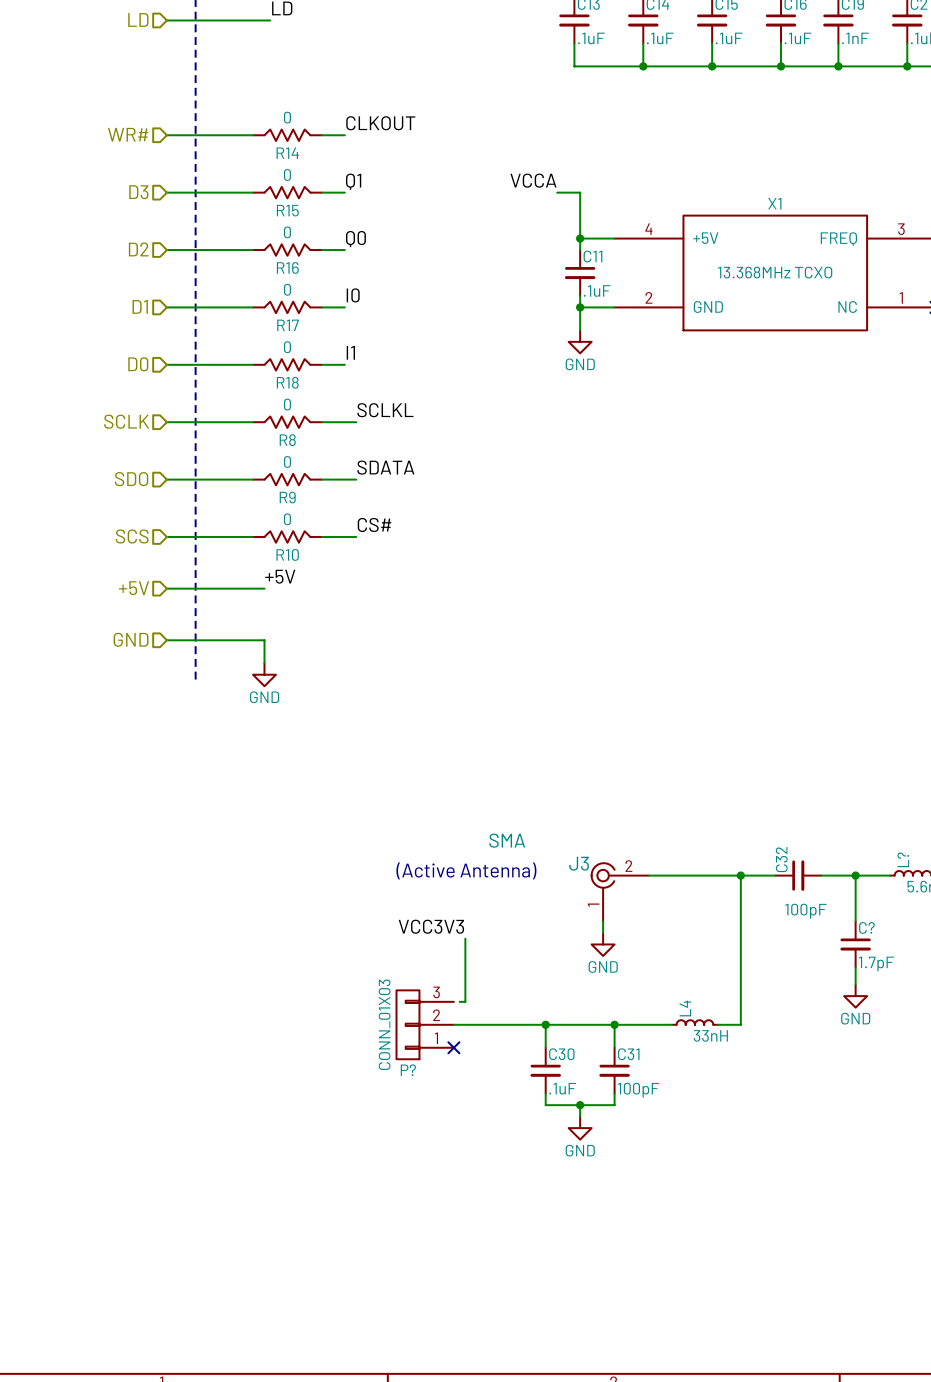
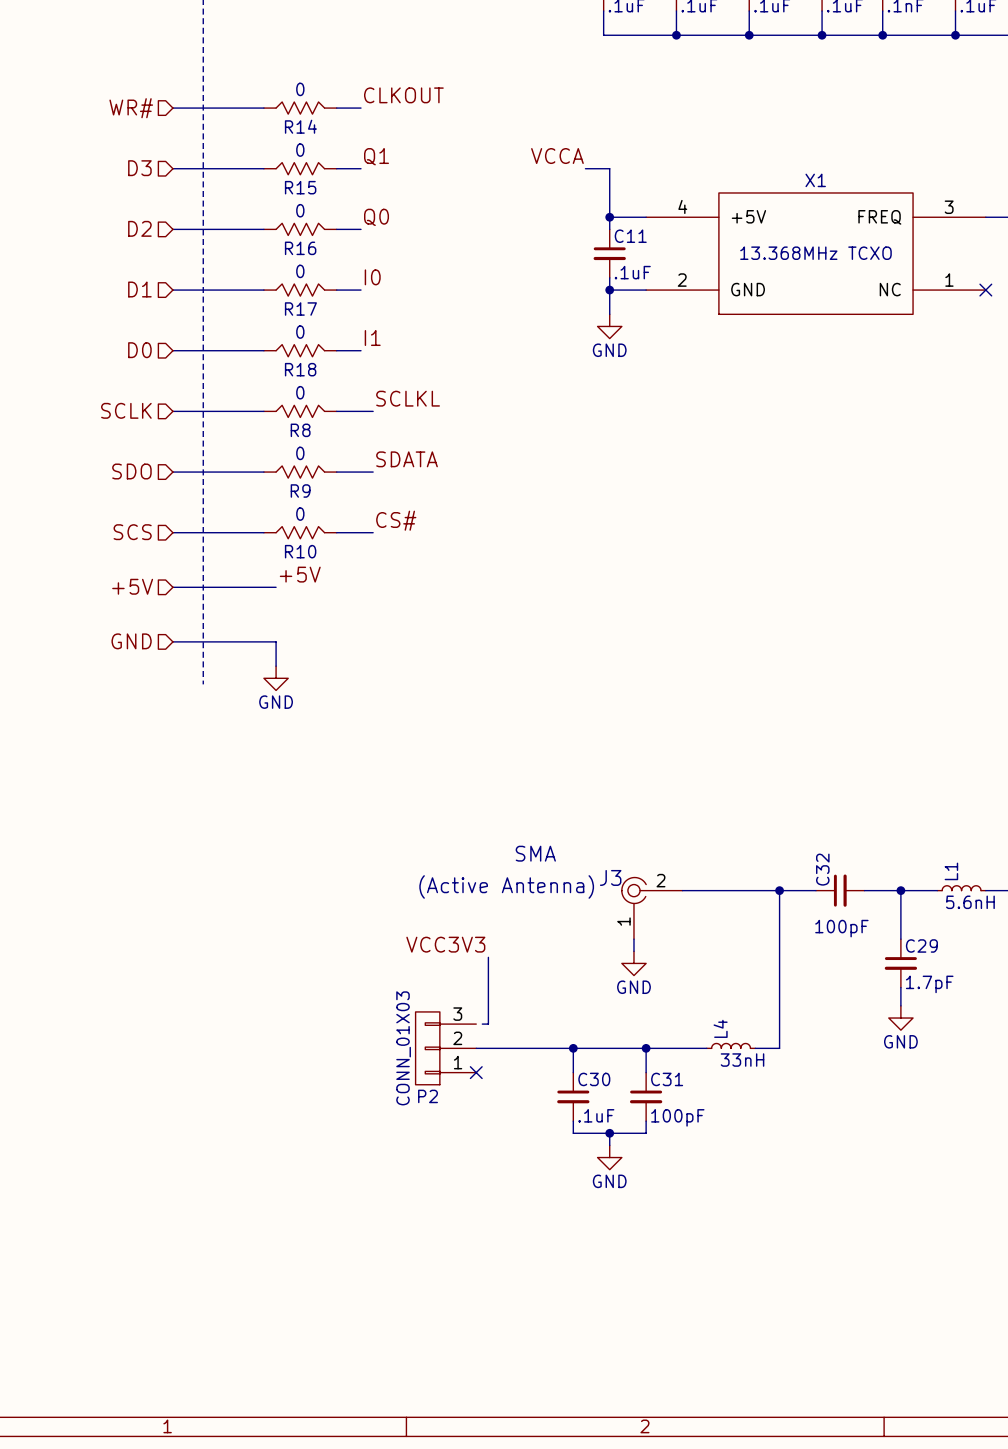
L? name: L? (903, 859) -> L1 (951, 871)
C? name: C? (866, 927) -> C29 (921, 945)
P? name: P? (408, 1070) -> P2 (428, 1096)

